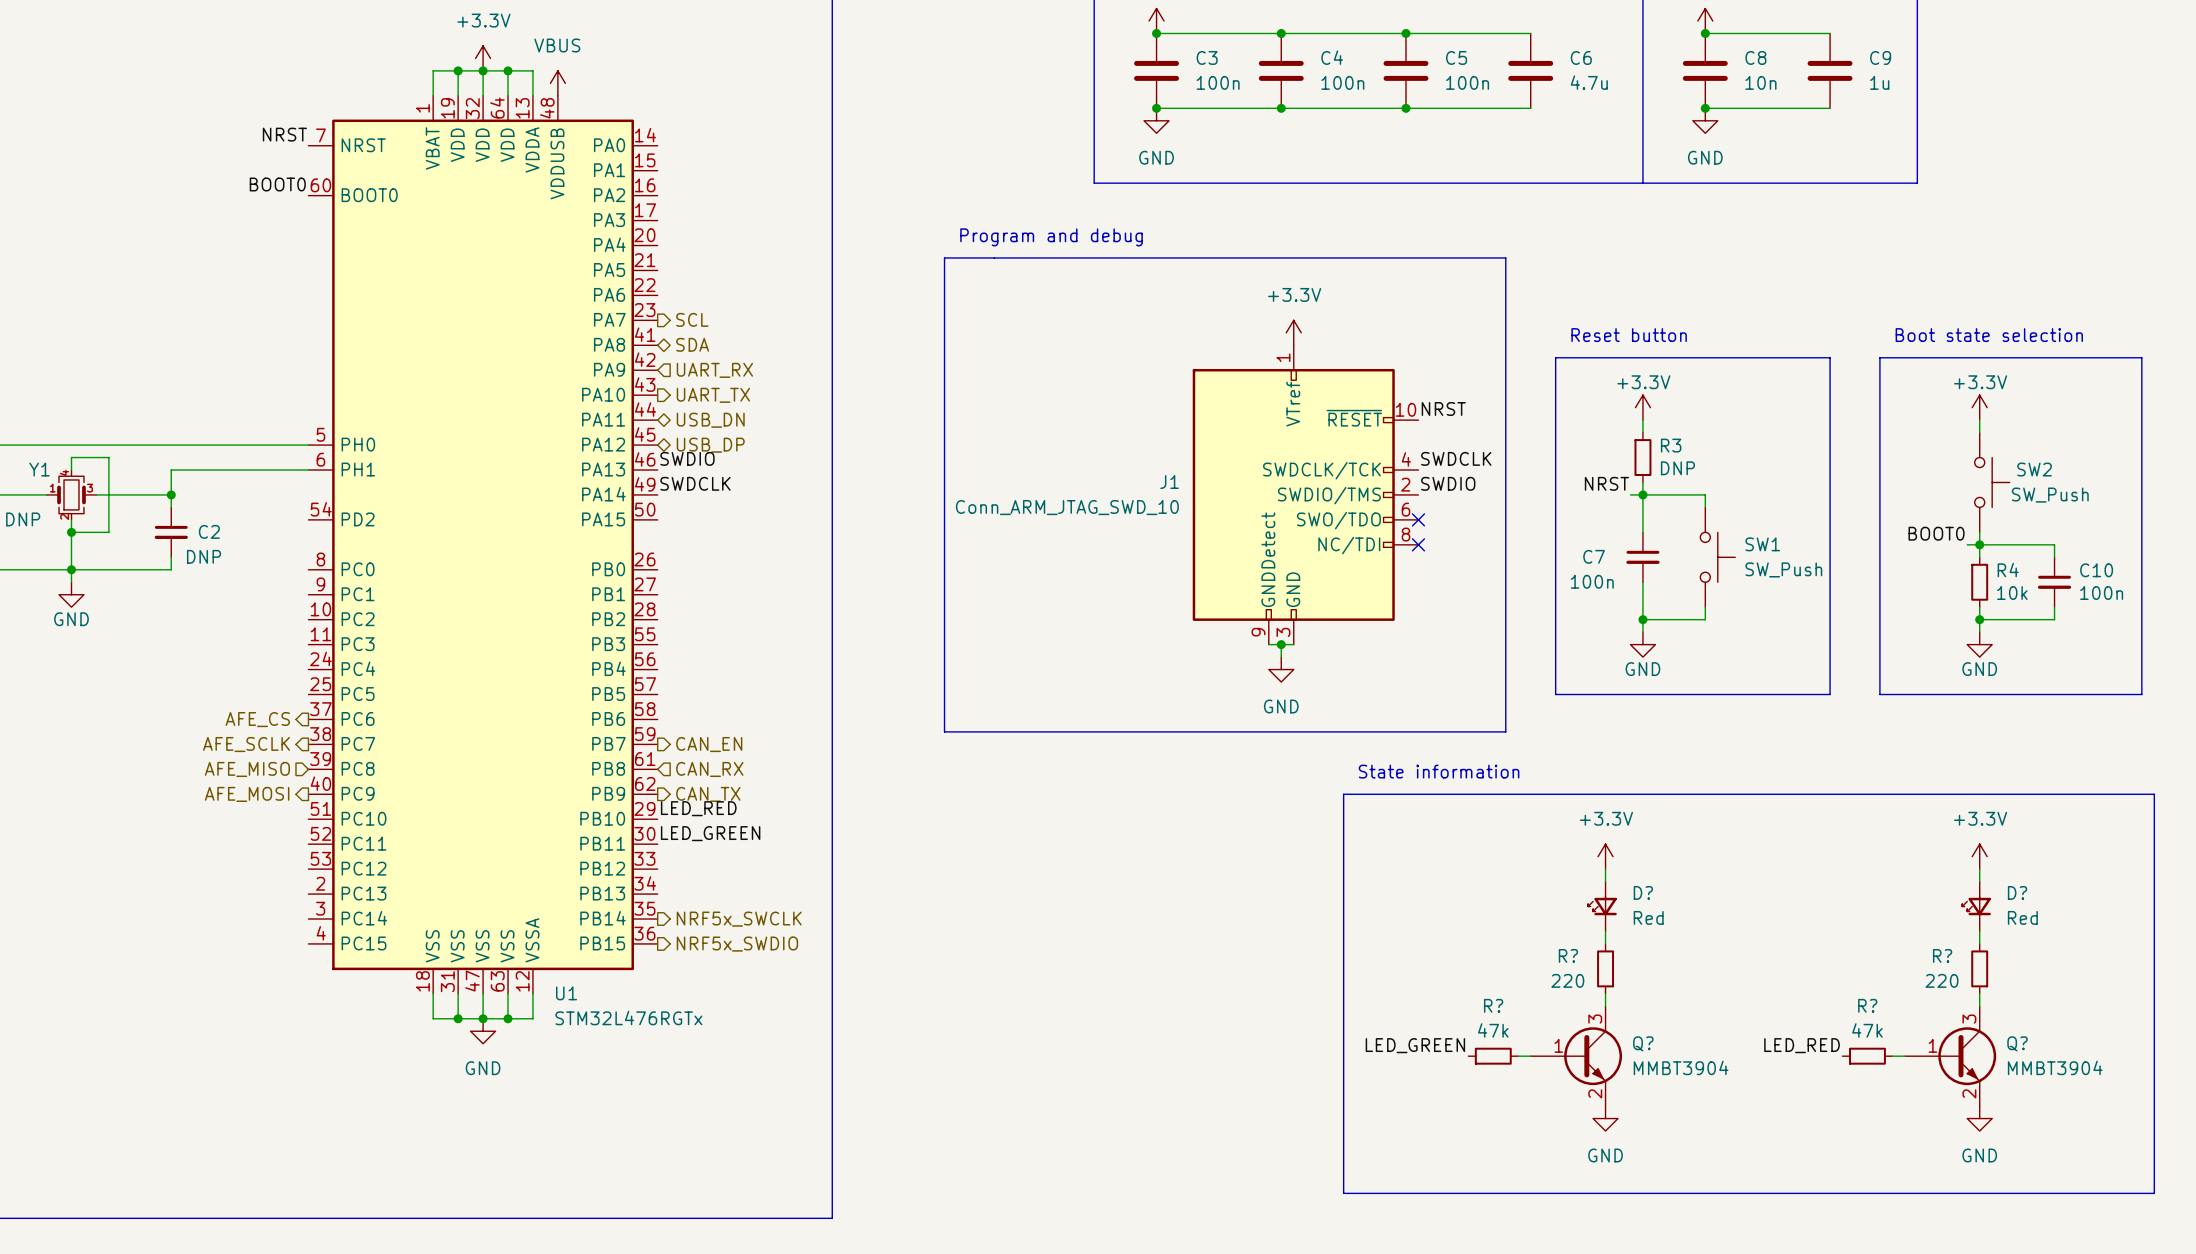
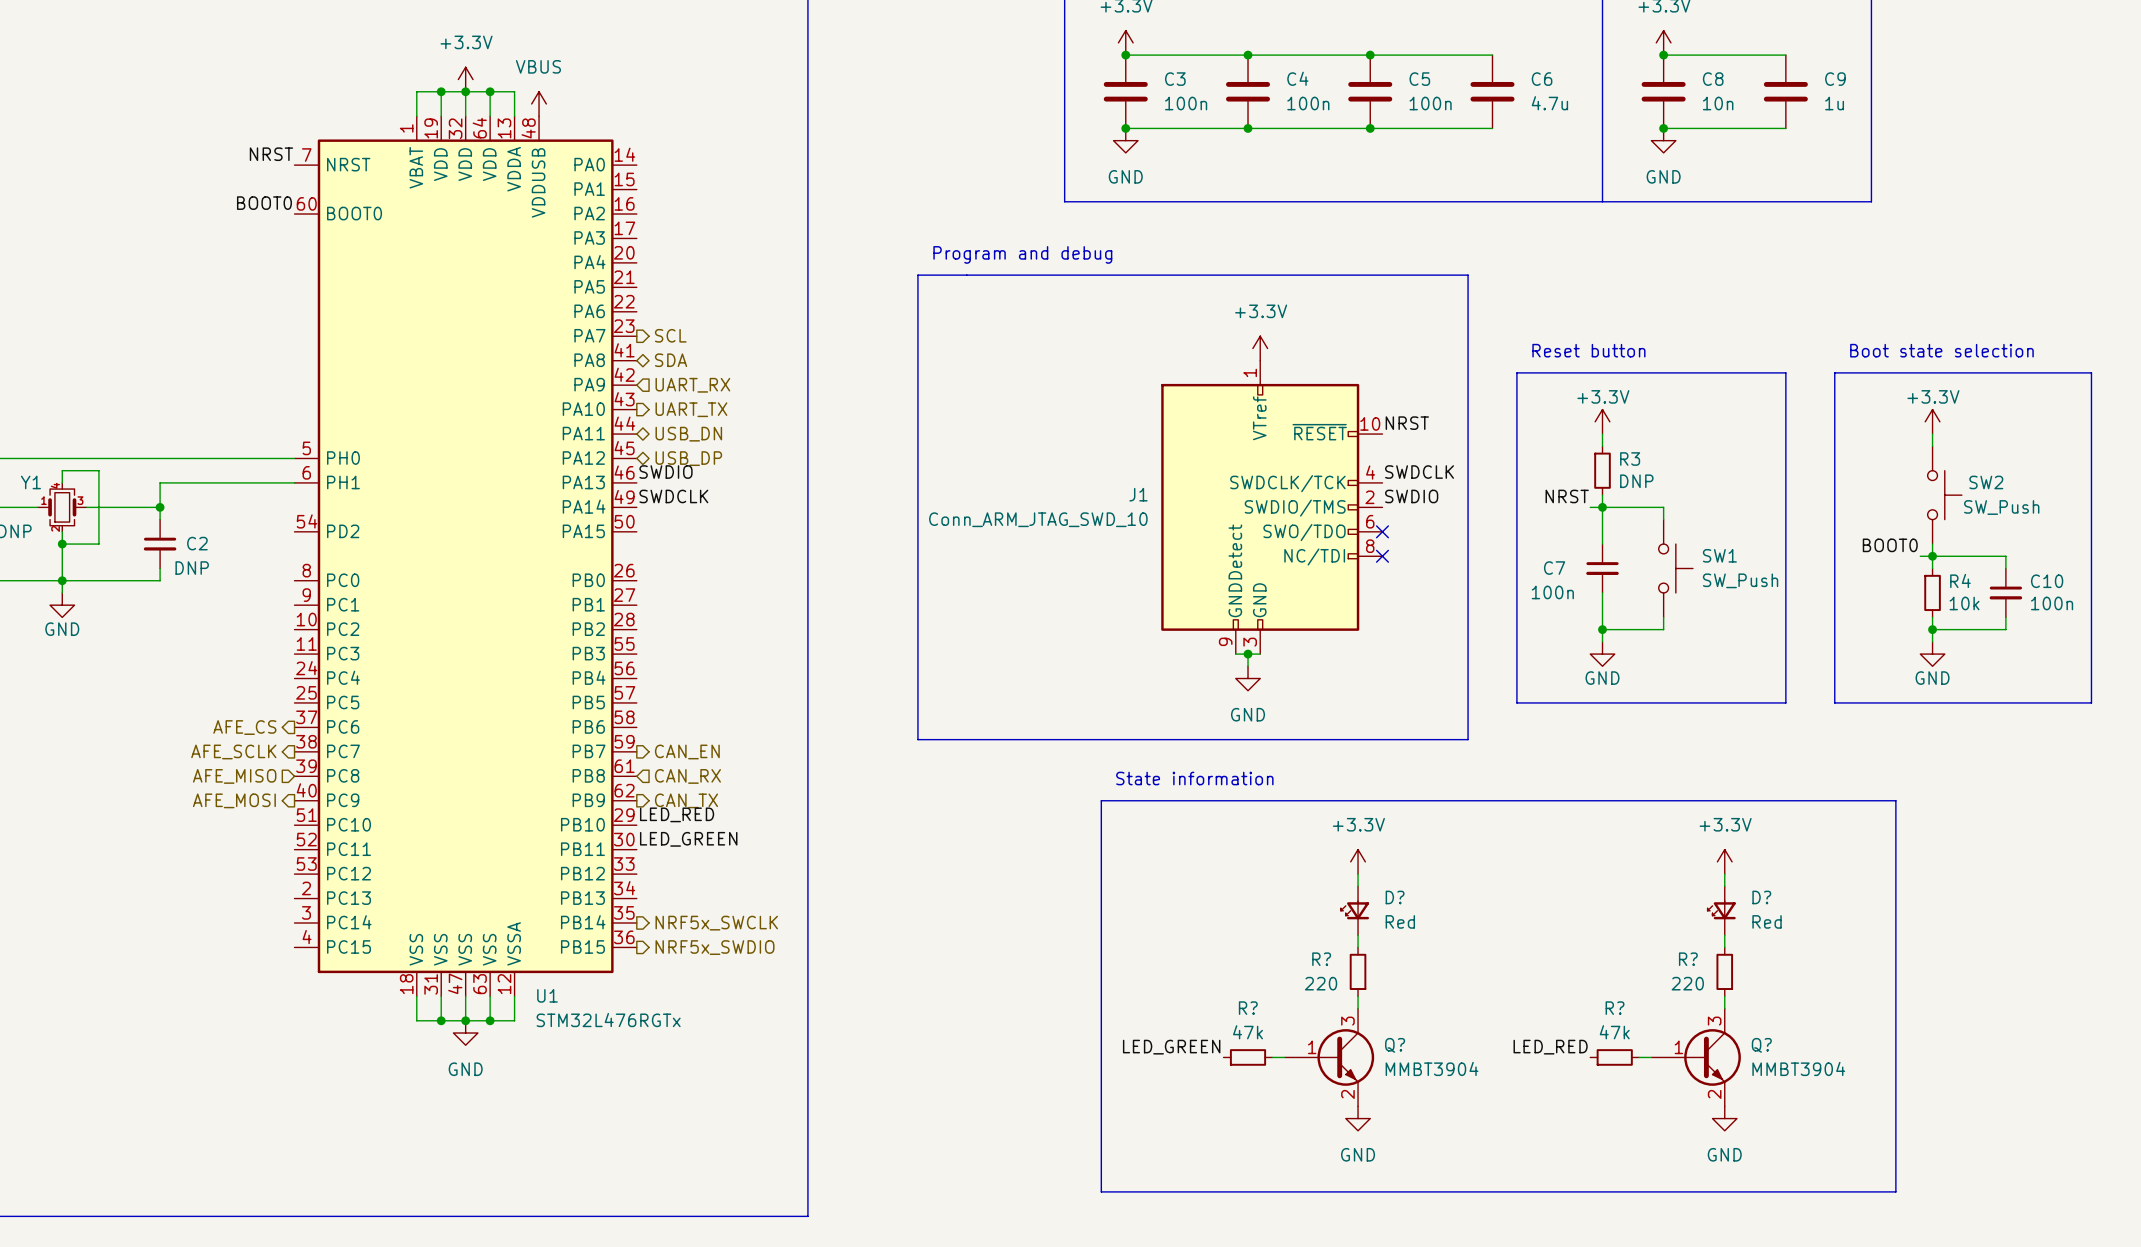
text position: State information (1439, 771) -> State information (1194, 778)
line: (1343, 794) (1343, 1193) -> (1309, 800) (1101, 800) (1101, 1191) (1309, 1191)
line: (1942, 794) (2154, 794) (2154, 1193) (1942, 1193) -> (1895, 800) (1895, 1191)
power symbol: none -> +3.3V (1358, 861)
power symbol: +3.3V (1605, 856) -> none
power symbol: none -> +3.3V (1724, 861)
power symbol: +3.3V (1979, 856) -> none
wire: (1605, 869) (1605, 881) -> (1358, 874) (1358, 886)
wire: (1979, 869) (1979, 881) -> (1724, 874) (1724, 886)
D?: none -> Red (1354, 910)
D?: Red (1602, 906) -> none
D?: none -> Red (1721, 910)
D?: Red (1976, 906) -> none
wire: (1605, 931) (1605, 943) -> (1358, 935) (1358, 947)
wire: (1979, 931) (1979, 943) -> (1724, 935) (1724, 947)
R?: none -> 220 (1358, 971)
R?: 220 (1605, 968) -> none
R?: none -> 220 (1724, 971)
R?: 220 (1979, 968) -> none
wire: (1605, 993) (1605, 1006) -> (1358, 996) (1358, 1008)
wire: (1979, 993) (1979, 1006) -> (1724, 996) (1724, 1008)
label position: LED_GREEN (1415, 1045) -> LED_GREEN (1171, 1047)
label position: LED_RED (1802, 1045) -> LED_RED (1550, 1047)
R?: none -> 47k (1248, 1057)
Q?: none -> MMBT3904 (1329, 1057)
R?: 47k (1493, 1056) -> none
wire: (1518, 1056) (1530, 1056) -> (1272, 1057) (1284, 1057)
Q?: MMBT3904 (1576, 1056) -> none
R?: none -> 47k (1614, 1057)
Q?: none -> MMBT3904 (1696, 1057)
R?: 47k (1867, 1056) -> none
wire: (1892, 1056) (1904, 1056) -> (1639, 1057) (1651, 1057)
Q?: MMBT3904 (1950, 1056) -> none
power symbol: none -> GND (1358, 1118)
power symbol: GND (1605, 1118) -> none
power symbol: none -> GND (1724, 1118)
power symbol: GND (1979, 1118) -> none

